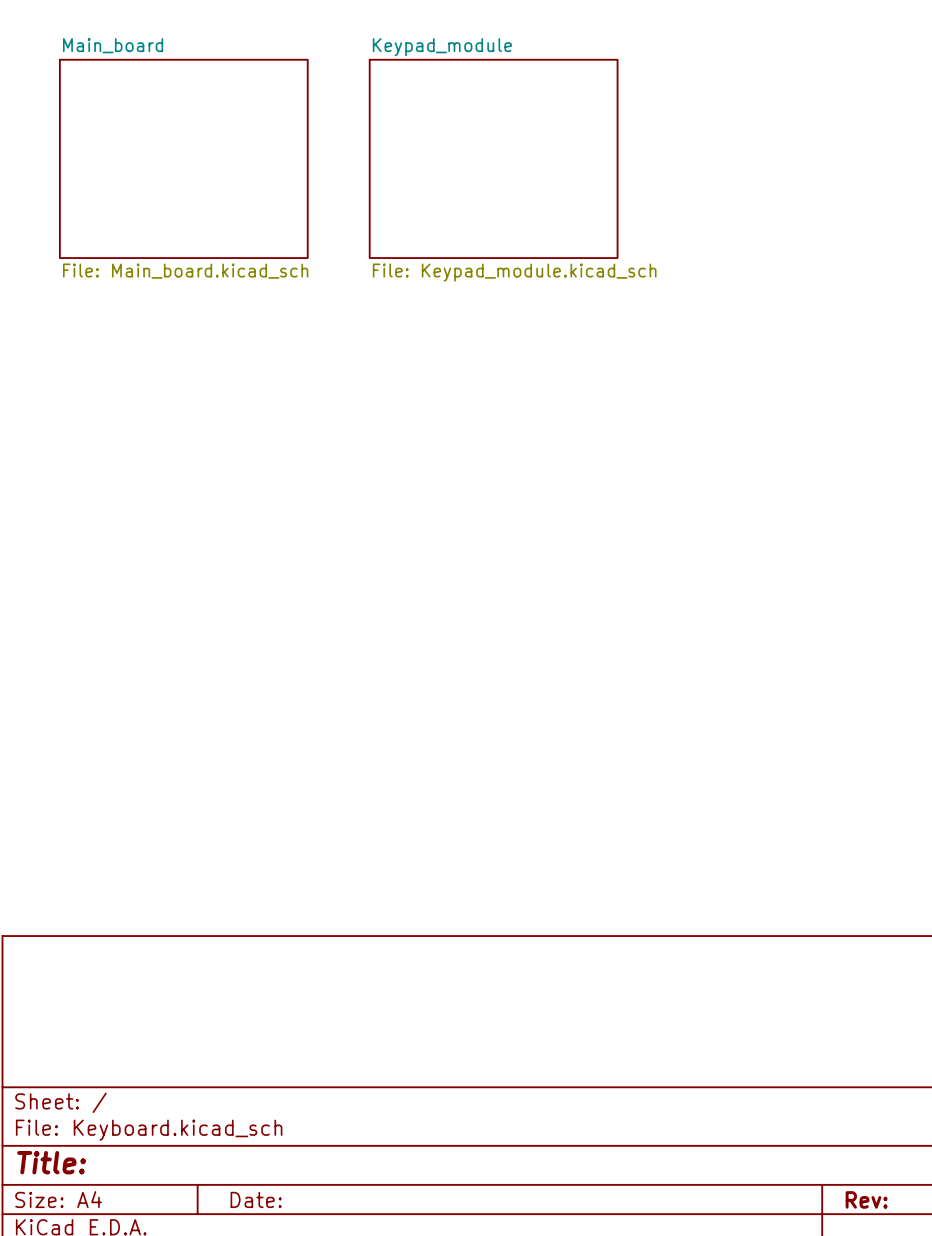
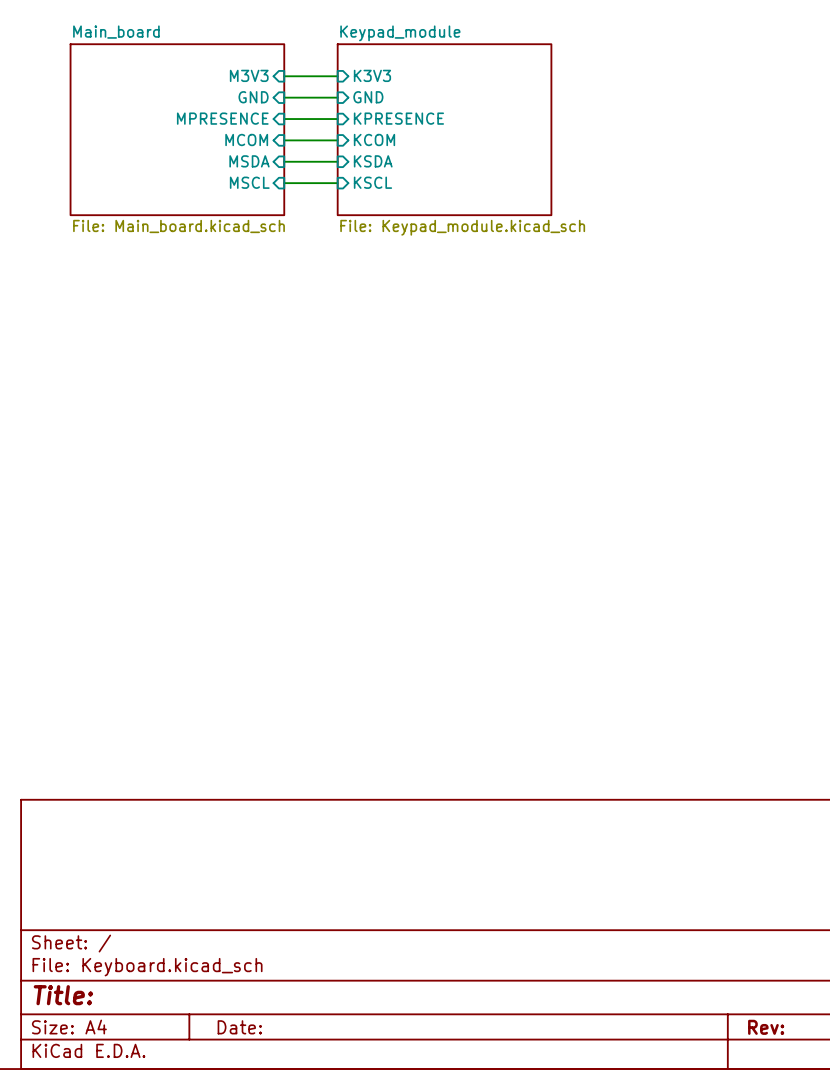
sheet pin: none -> M3V3 (249, 75)
wire: none -> (284, 76) (337, 76)
sheet pin: none -> K3V3 (372, 75)
sheet pin: none -> GND (253, 97)
wire: none -> (284, 97) (337, 97)
sheet pin: none -> GND (368, 97)
sheet pin: none -> MPRESENCE (222, 118)
wire: none -> (284, 119) (337, 119)
sheet pin: none -> KPRESENCE (398, 118)
sheet pin: none -> MCOM (246, 139)
sheet pin: none -> KCOM (374, 139)
wire: none -> (284, 140) (337, 140)
sheet pin: none -> MSDA (249, 161)
sheet pin: none -> KSDA (373, 161)
wire: none -> (284, 161) (337, 161)
sheet pin: none -> MSCL (249, 182)
wire: none -> (284, 183) (337, 183)
sheet pin: none -> KSCL (372, 182)

